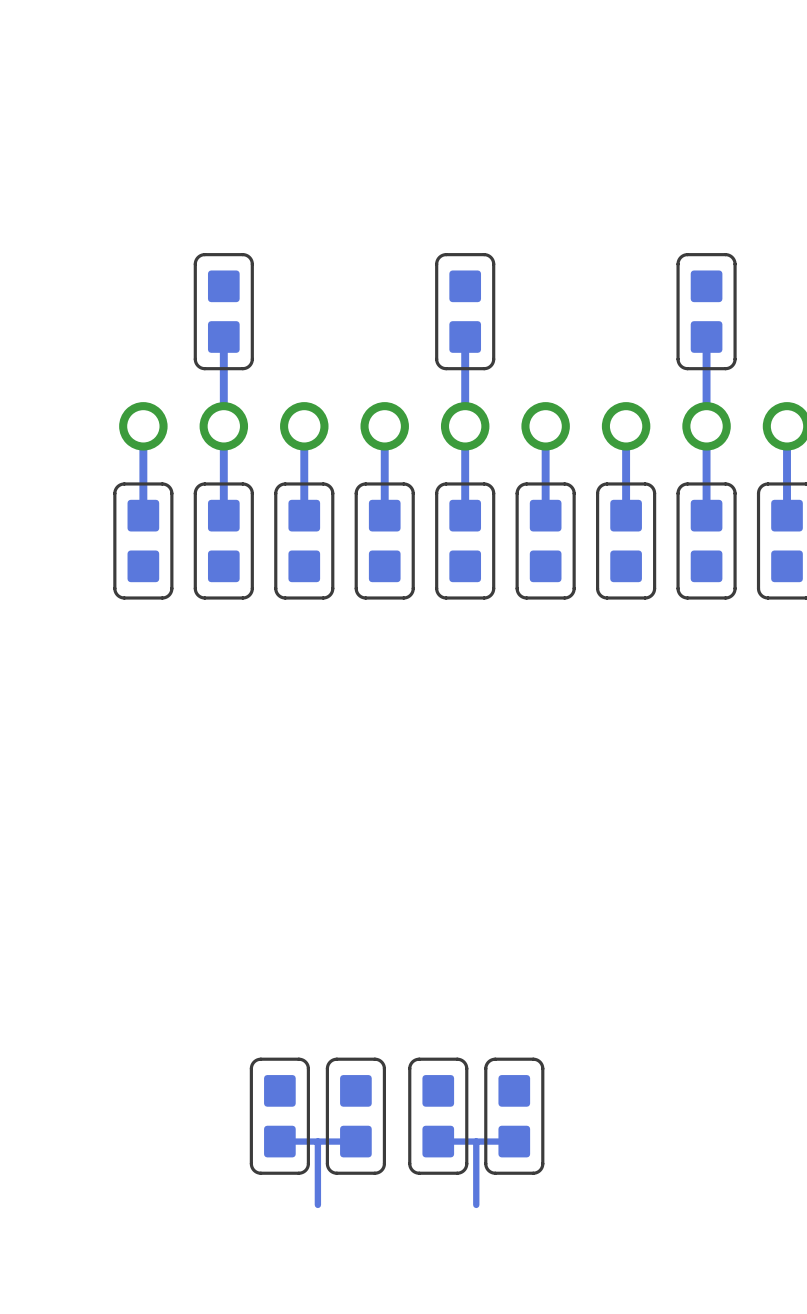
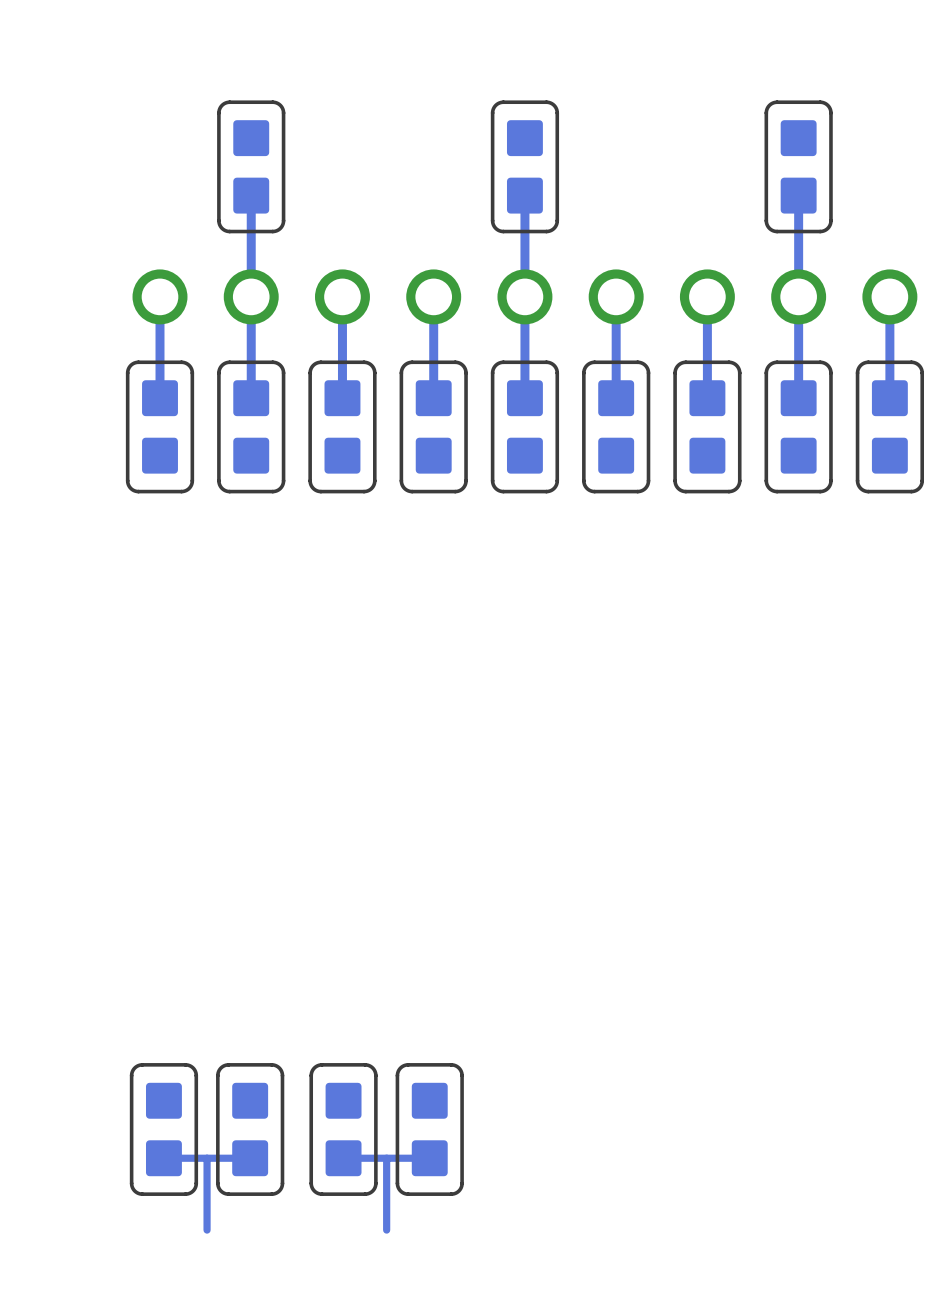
part: (279, 1116) -> none
part: (355, 1116) -> none
part: (438, 1116) -> none
part: (514, 1116) -> none
track: (317, 1141) (317, 1204) -> (386, 1158) (386, 1230)
track: (355, 1141) (279, 1141) -> (429, 1158) (343, 1158)
track: (476, 1141) (476, 1204) -> (207, 1158) (207, 1230)
track: (514, 1141) (438, 1141) -> (250, 1158) (163, 1158)
part: none -> (163, 1129)
part: none -> (250, 1129)
part: none -> (343, 1129)
part: none -> (429, 1129)

